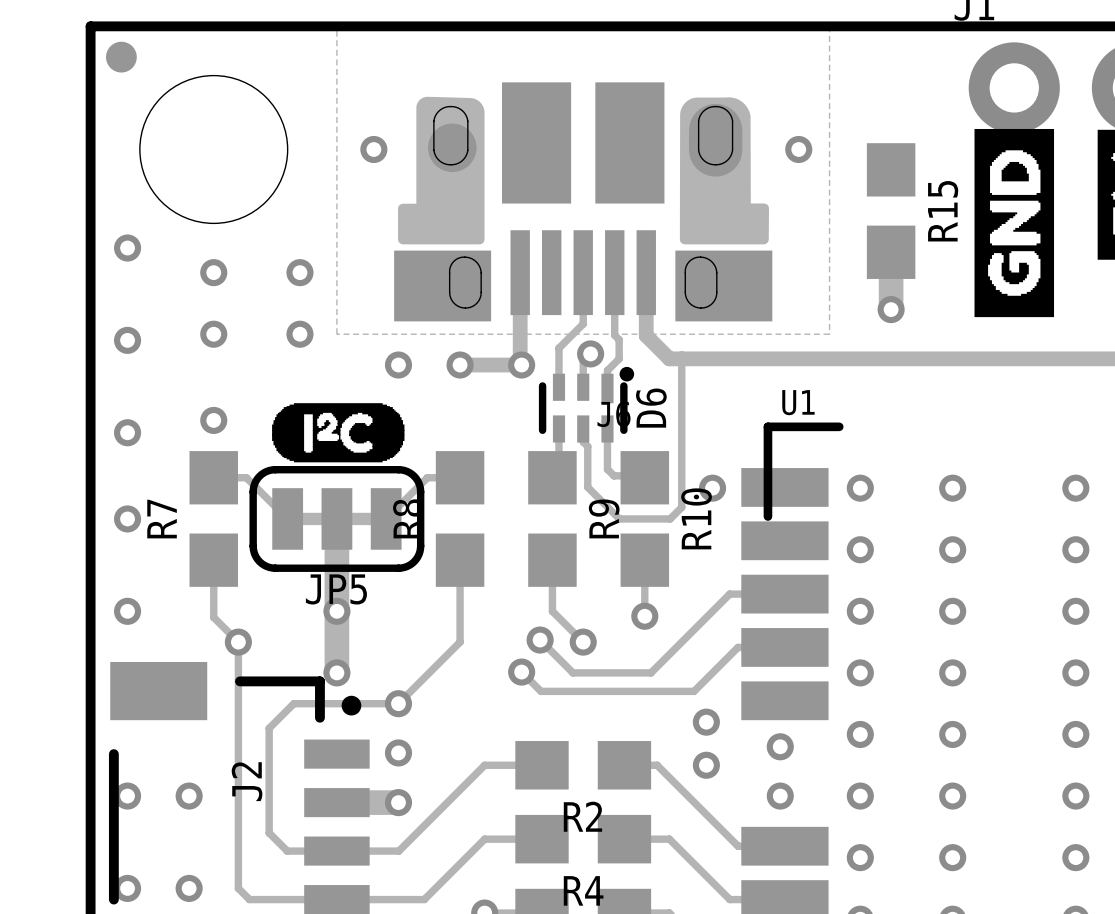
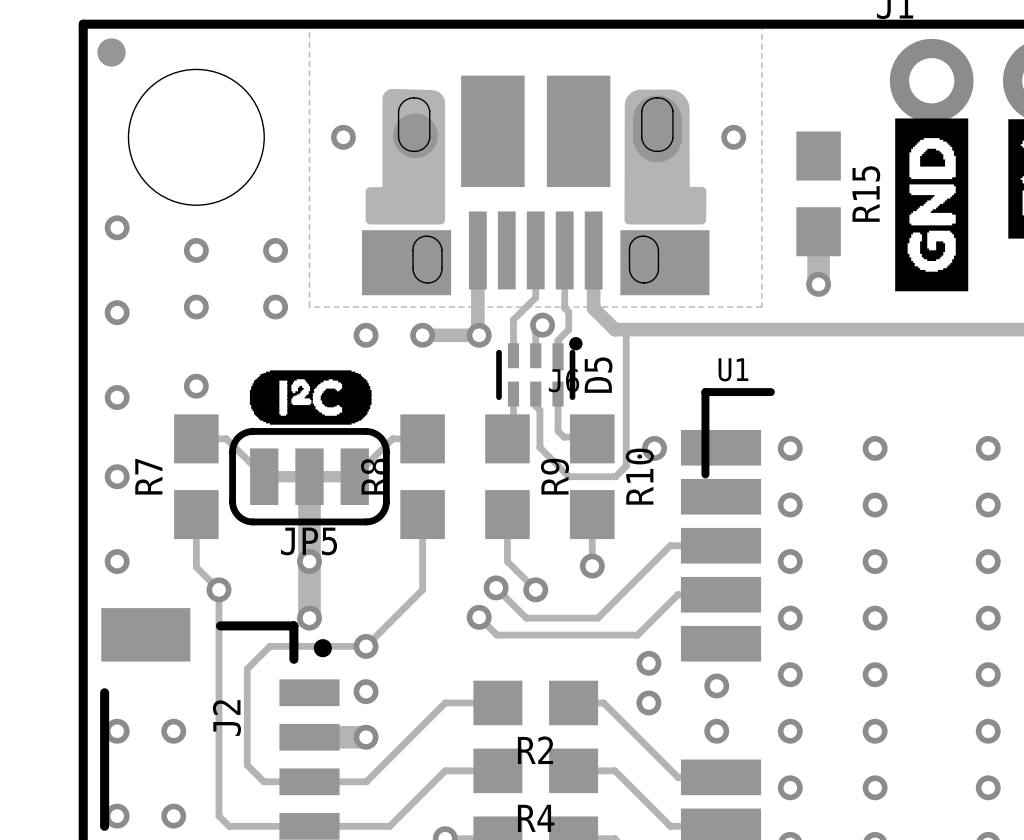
D6: (586, 404) -> none
D5: none -> (539, 371)

